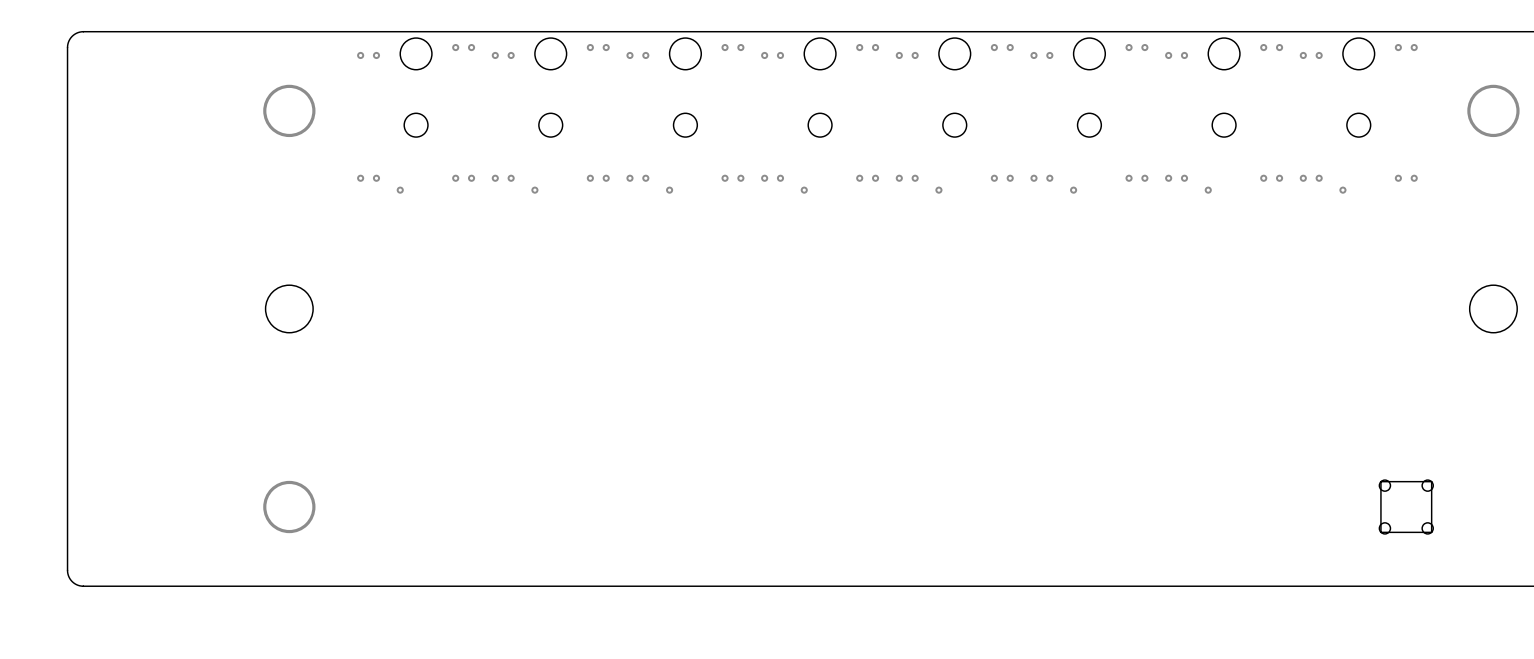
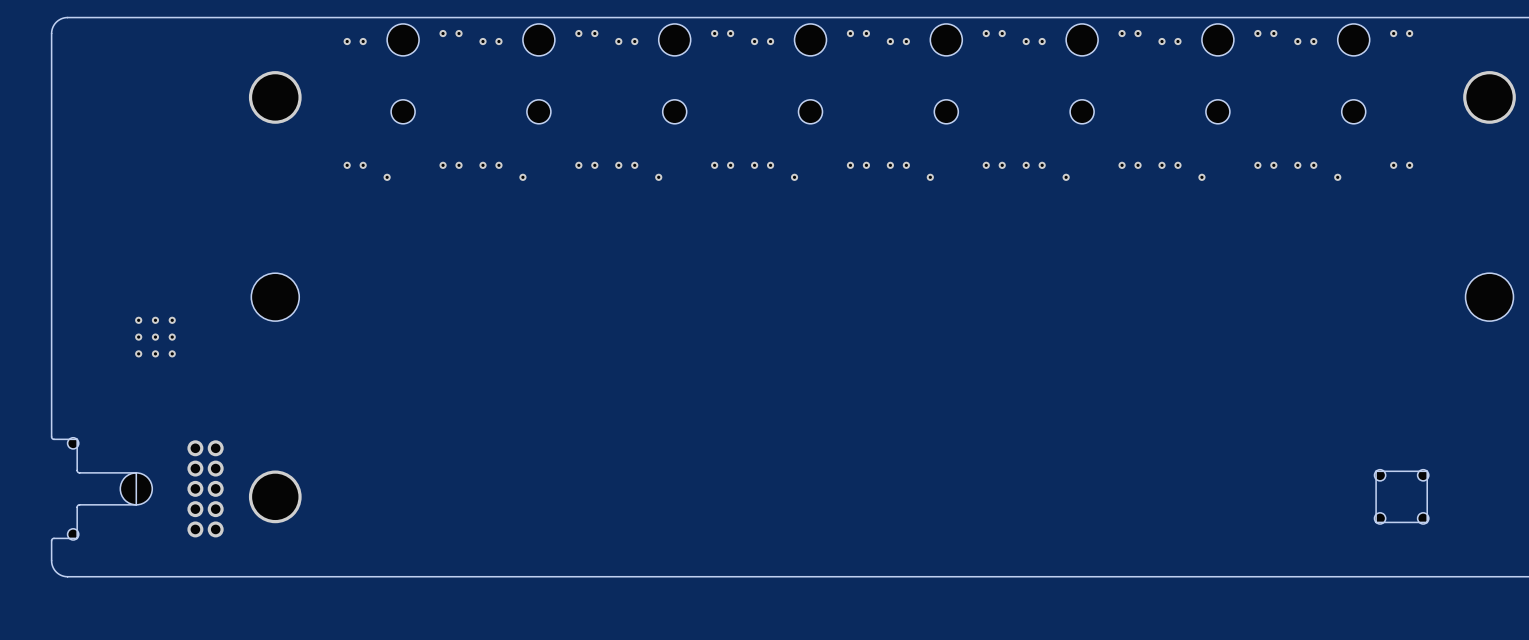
part: none -> (155, 337)
board edge: (67, 447) (67, 550) -> none
part: none -> (101, 488)
part: none -> (205, 488)

